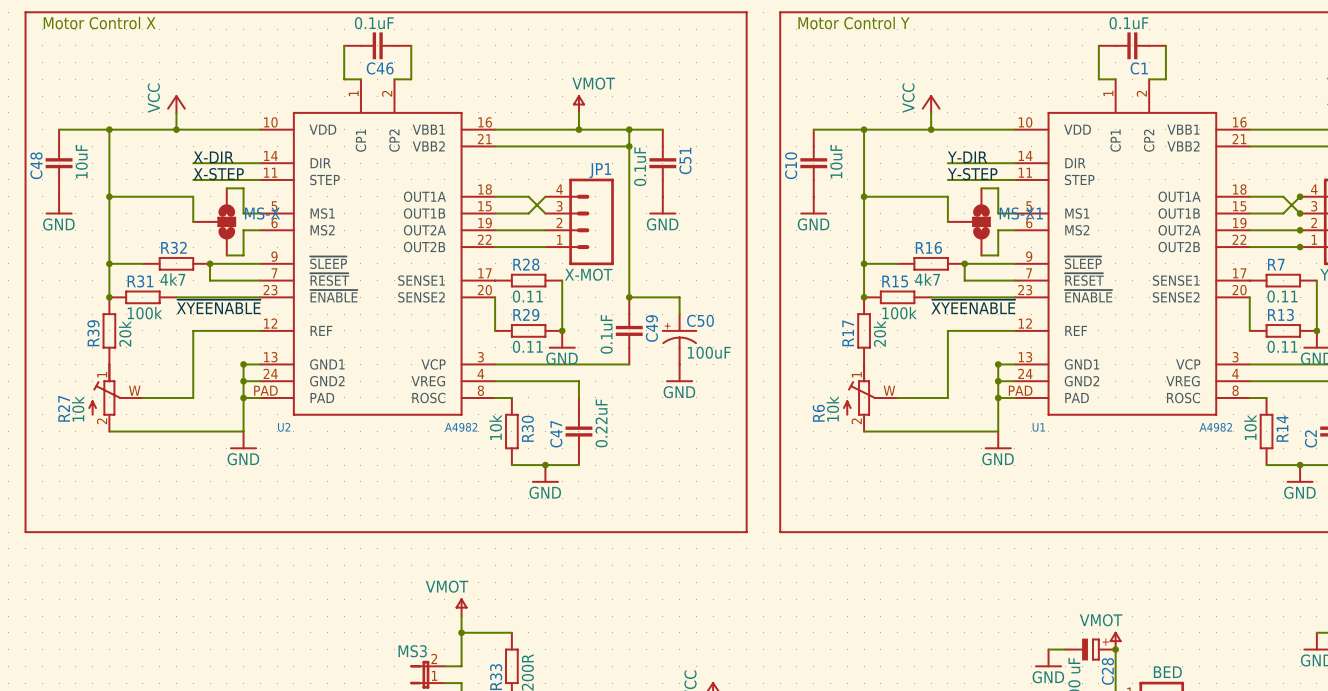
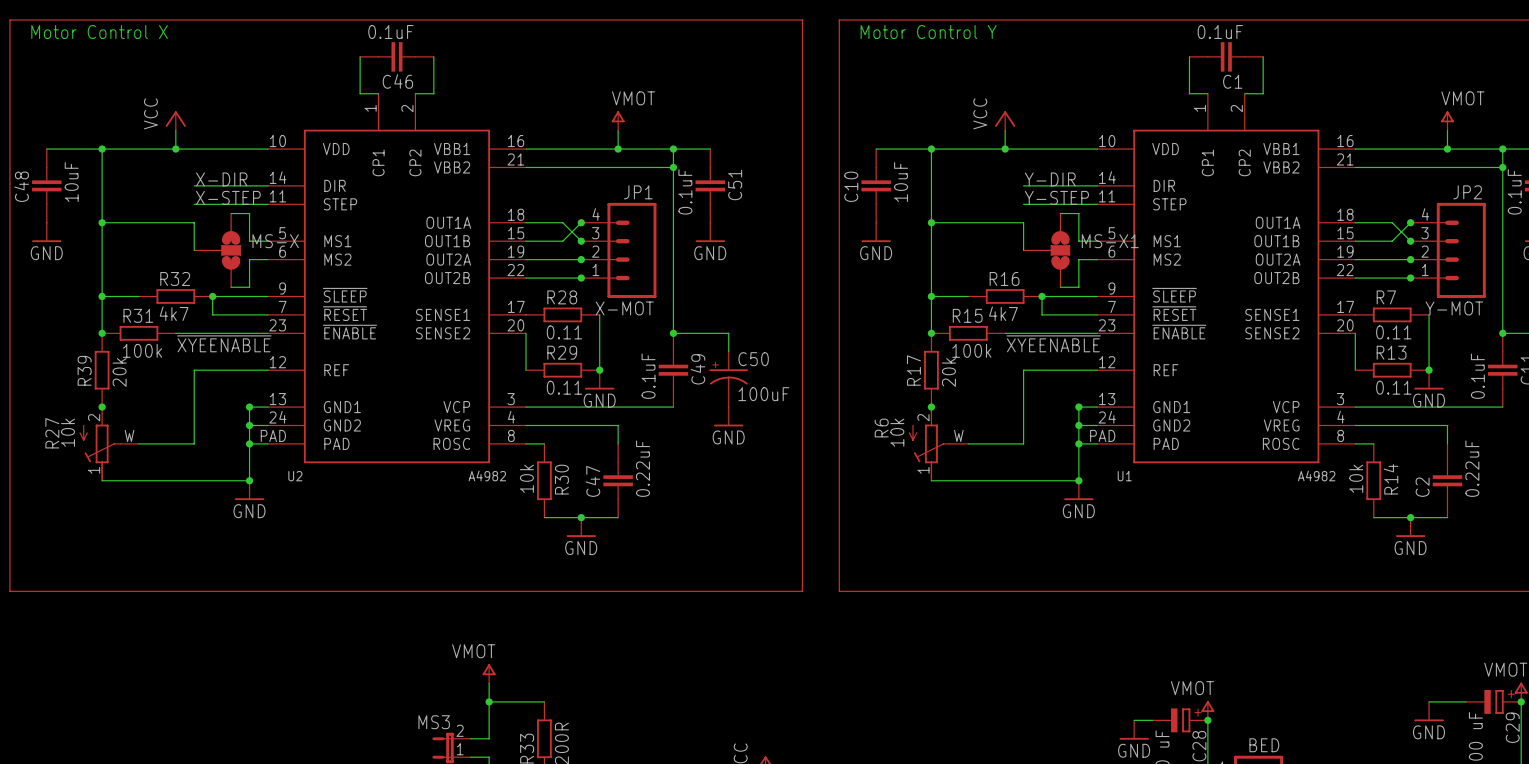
junction: none -> (581, 222)
junction: none -> (581, 241)
junction: none -> (581, 259)
junction: none -> (581, 278)
junction: none -> (102, 407)
junction: none -> (931, 407)
R27 flip: as is (107, 389) -> up-down (100, 452)
R6 flip: as is (862, 389) -> up-down (929, 452)
junction: none -> (249, 480)
junction: none -> (1078, 480)

